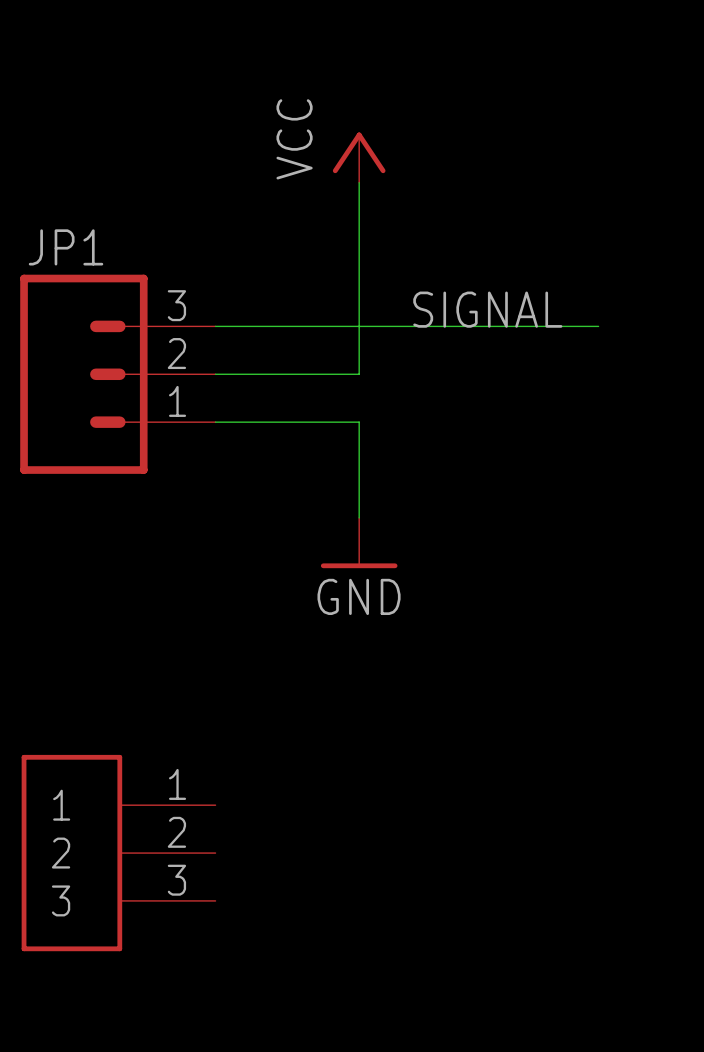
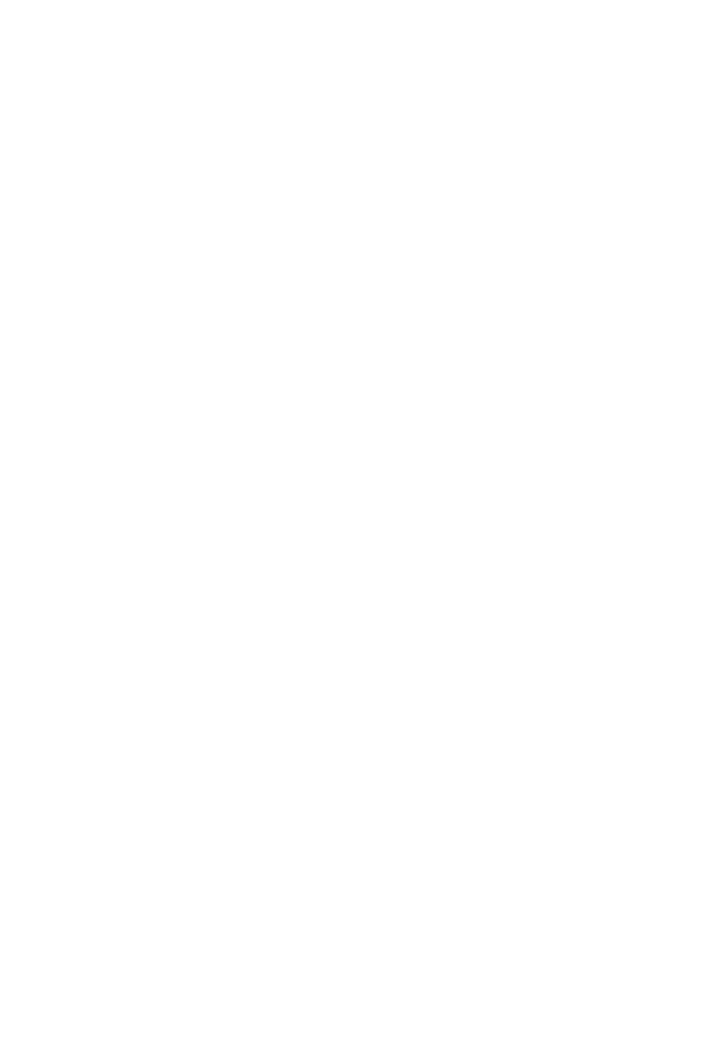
power symbol: VCC (359, 157) -> none
wire: (359, 182) (359, 374) (215, 374) -> none
label: SIGNAL (487, 309) -> none
wire: (215, 326) (598, 326) -> none
JP1: (117, 374) -> none
wire: (215, 422) (359, 422) (359, 517) -> none
power symbol: GND (359, 543) -> none
part: (118, 853) -> none

